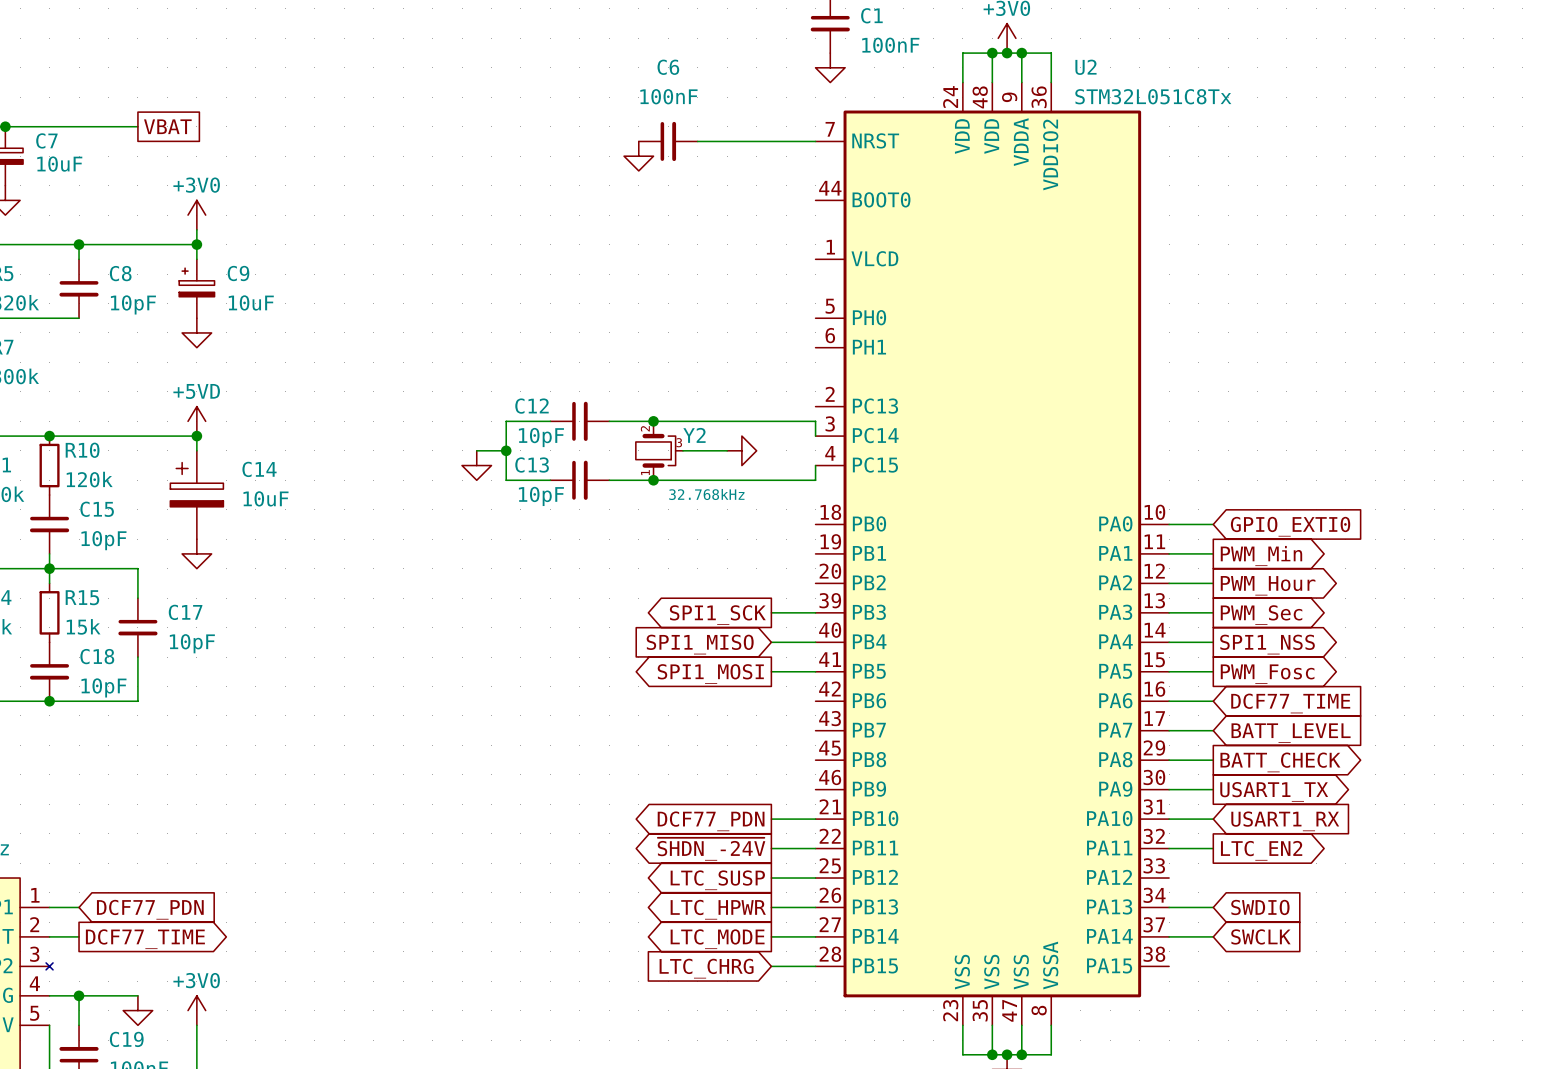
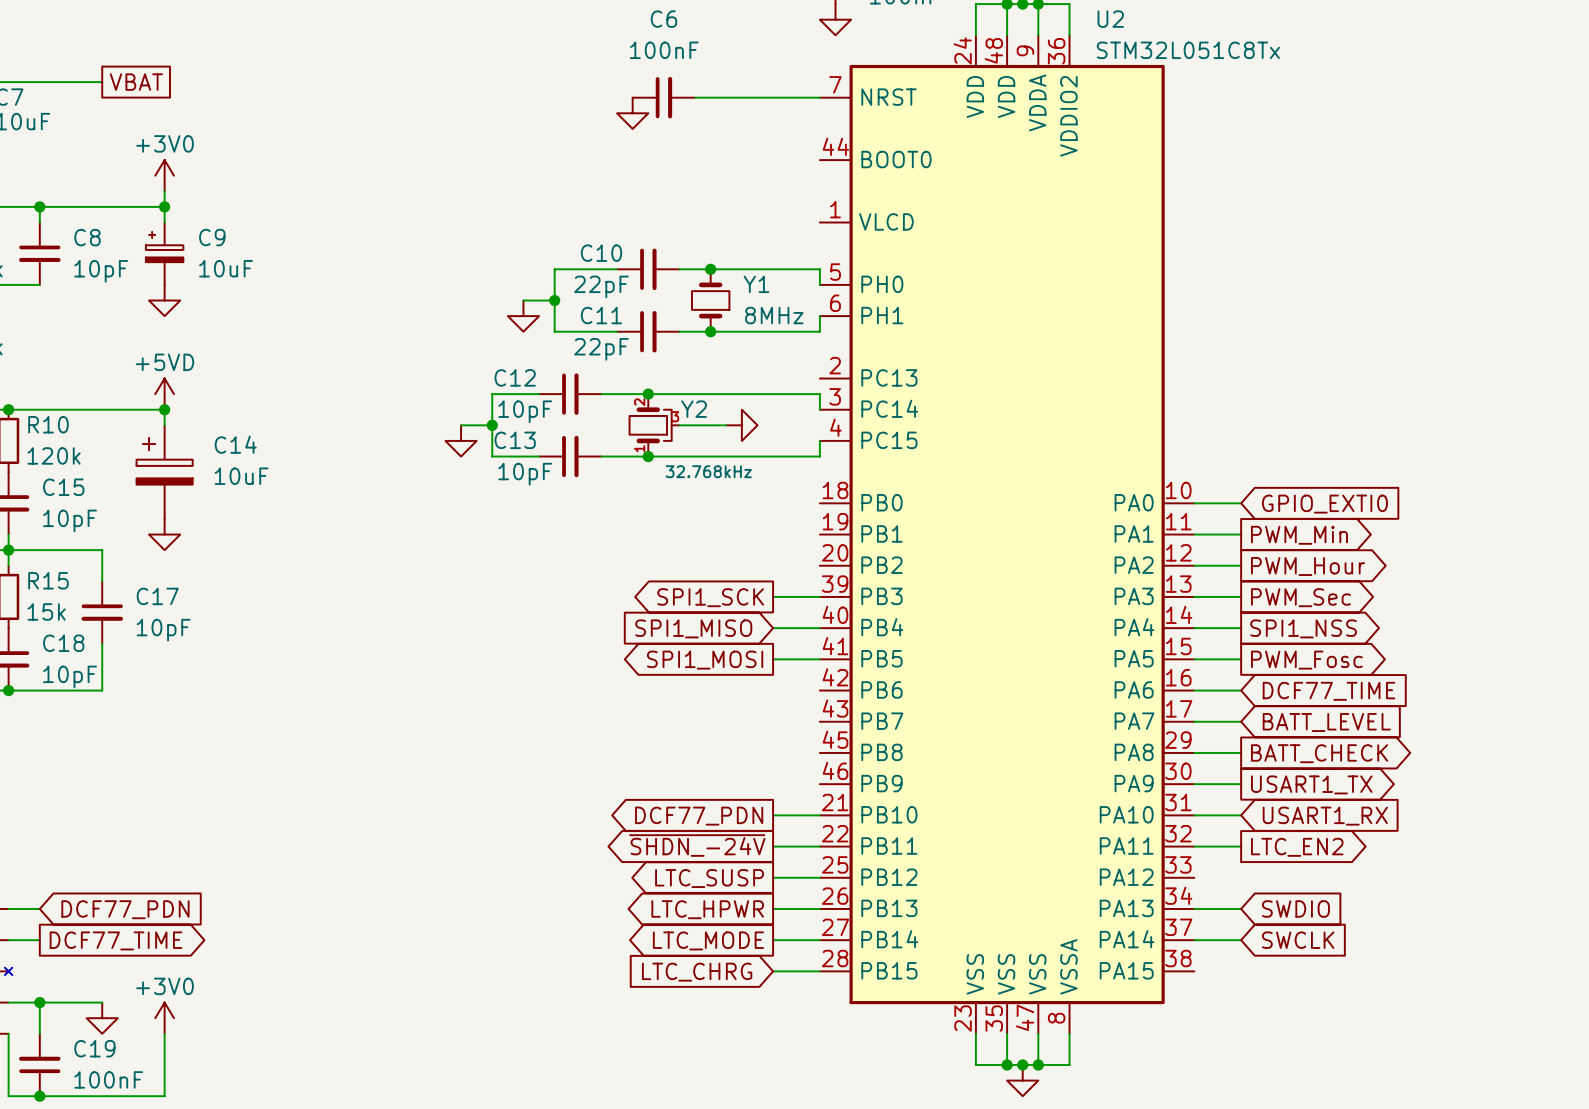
wire: none -> (617, 269) (554, 269) (554, 331) (617, 331)
C10: none -> 22pF (648, 269)
wire: none -> (679, 269) (819, 269) (819, 284)
junction: none -> (710, 269)
wire: none -> (523, 300) (554, 300)
junction: none -> (554, 300)
Y1: none -> 8MHz (710, 300)
power symbol: none -> (523, 316)
wire: none -> (819, 316) (819, 331) (679, 331)
C11: none -> 22pF (648, 331)
junction: none -> (710, 331)

